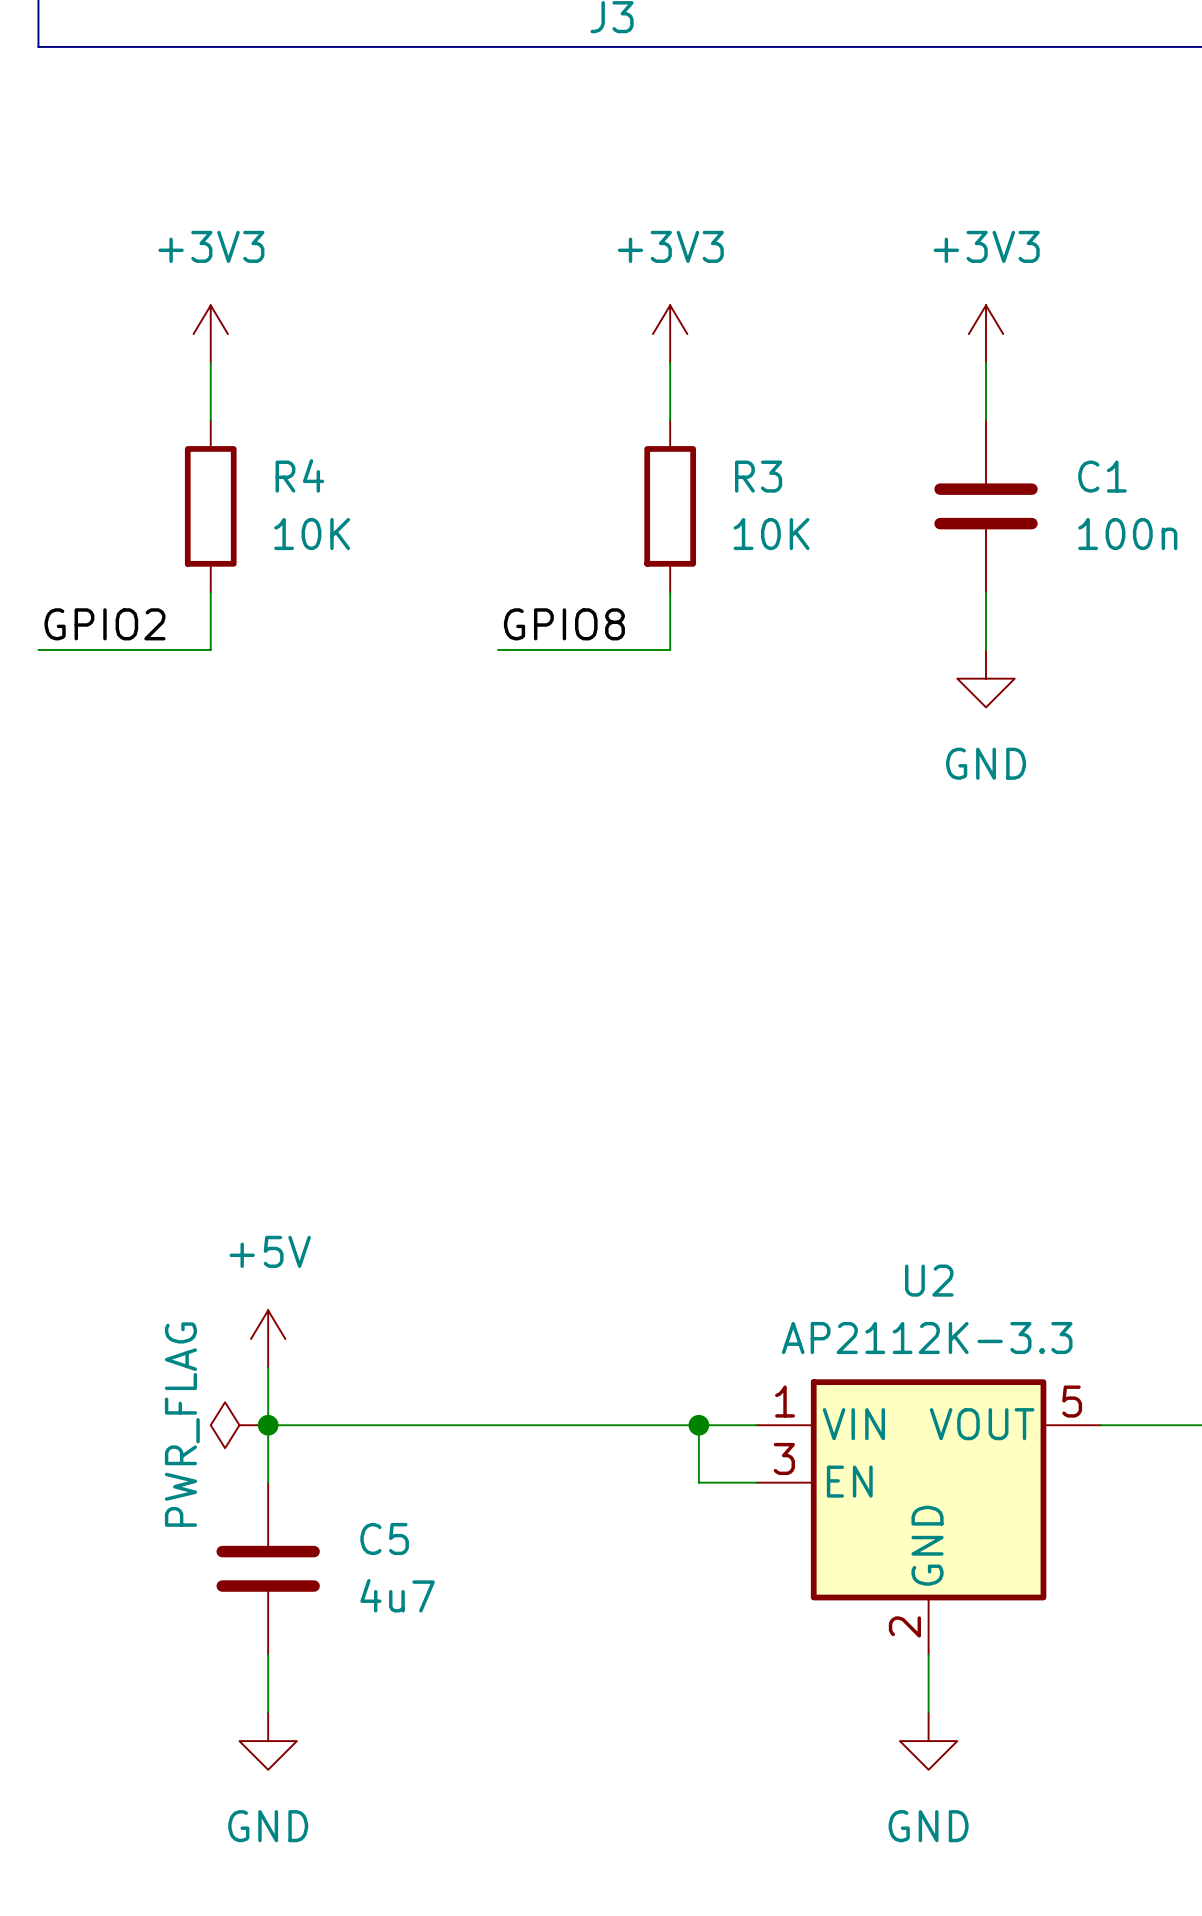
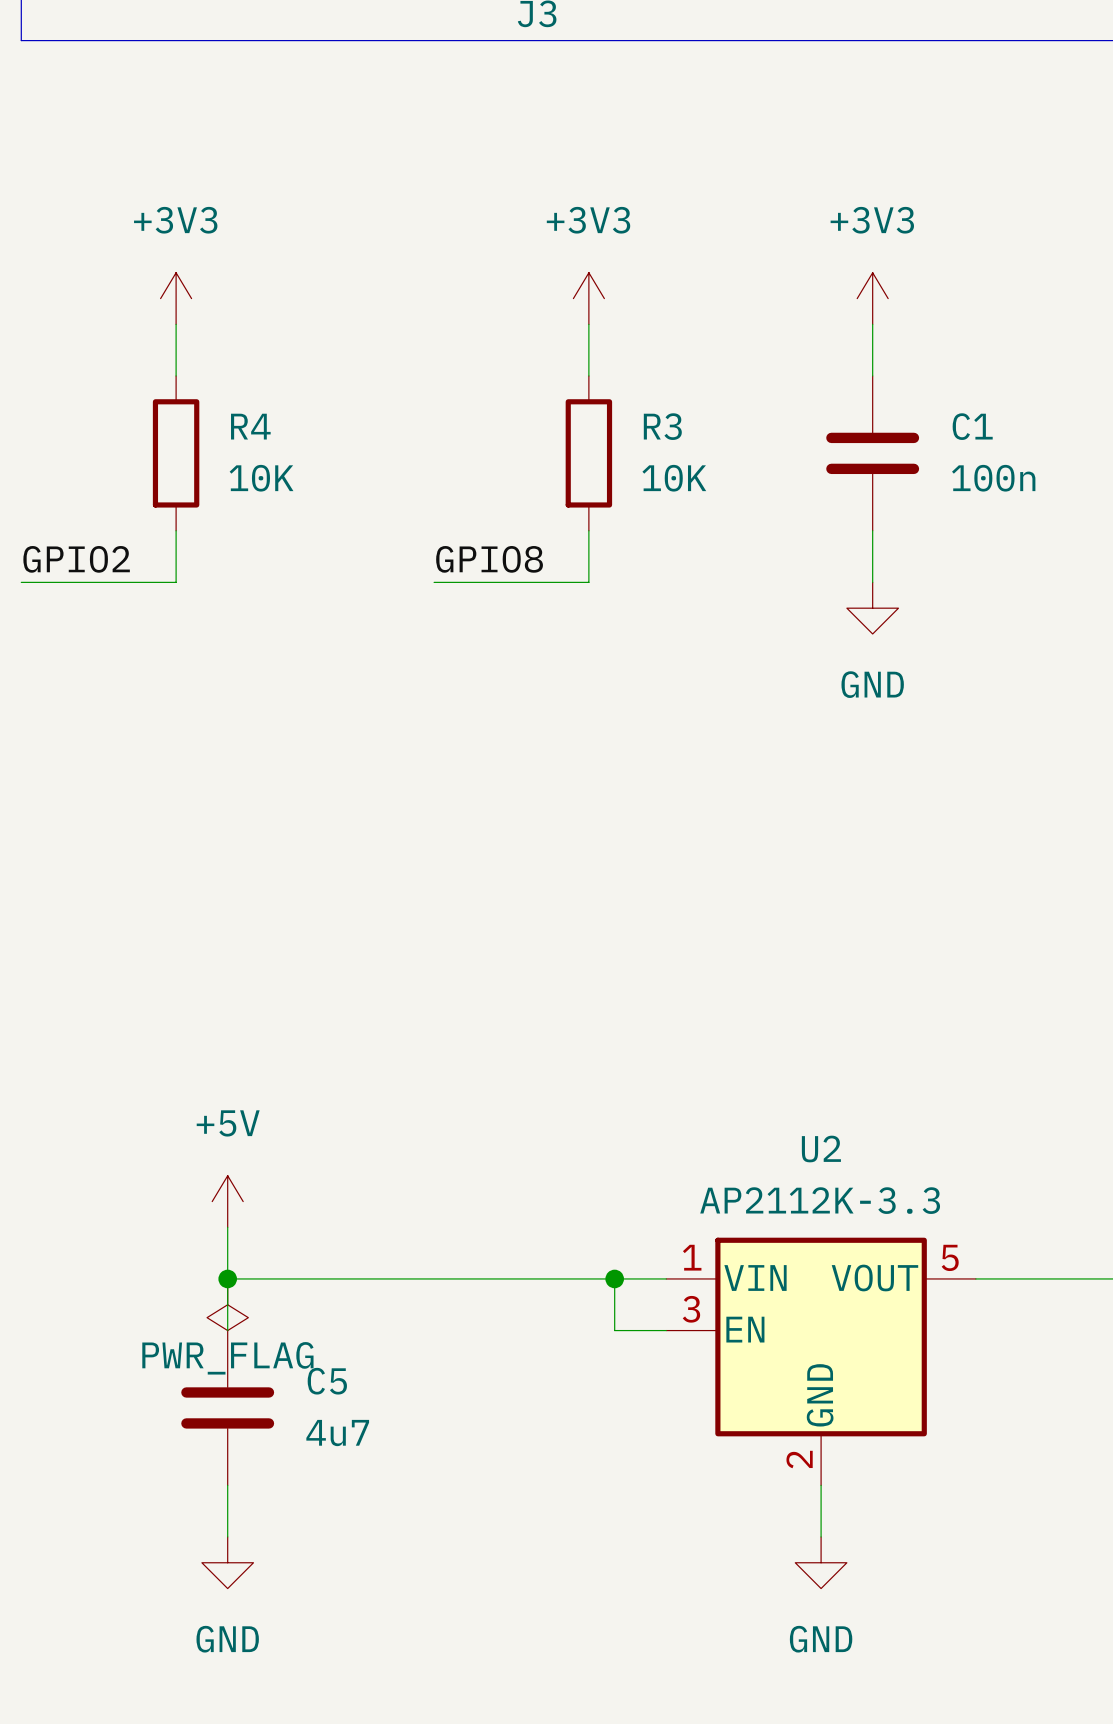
power symbol rotation: 0° (239, 1425) -> 90° counterclockwise (227, 1304)
power symbol position: PWR_FLAG (239, 1425) -> PWR_FLAG (227, 1304)

